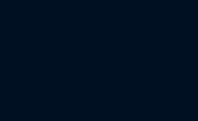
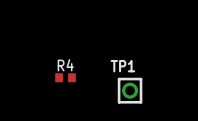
R4: none -> (65, 77)
TP1: none -> (130, 90)

